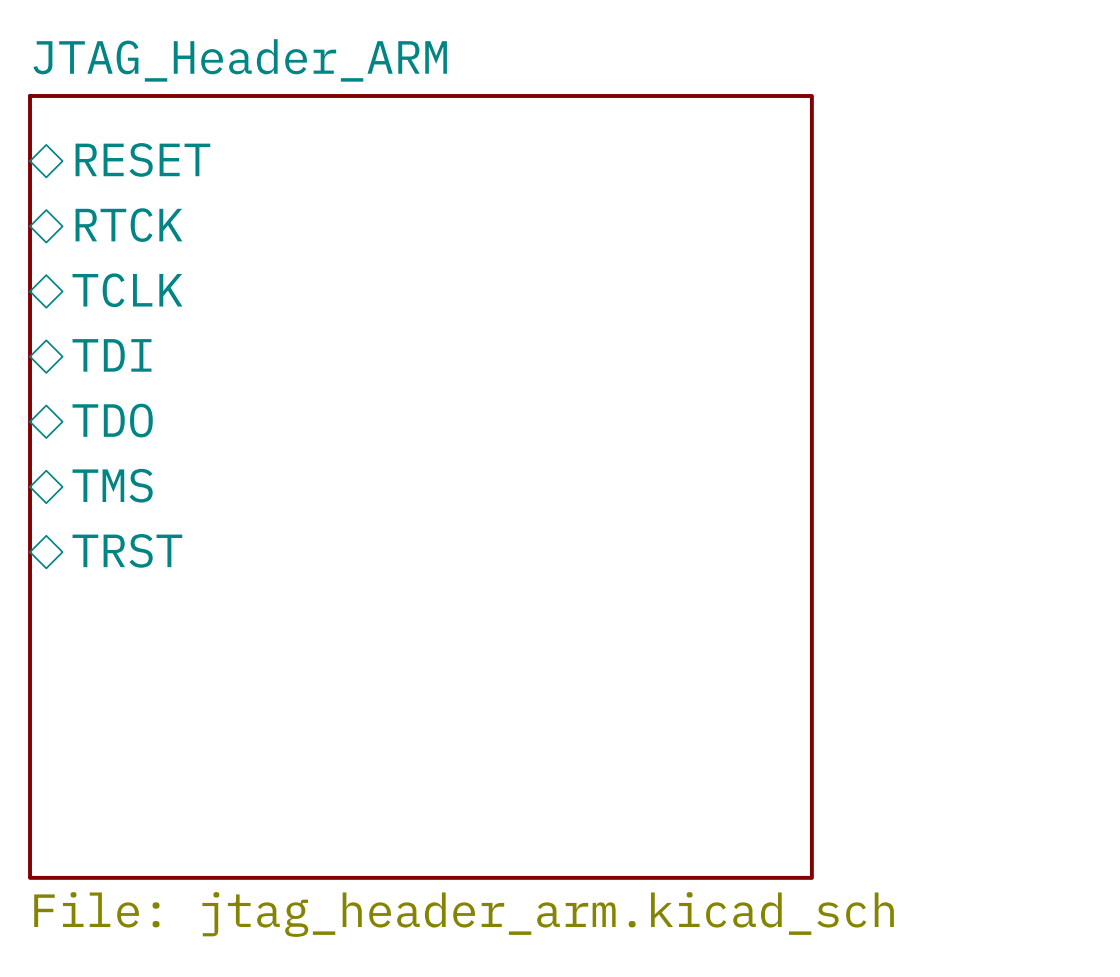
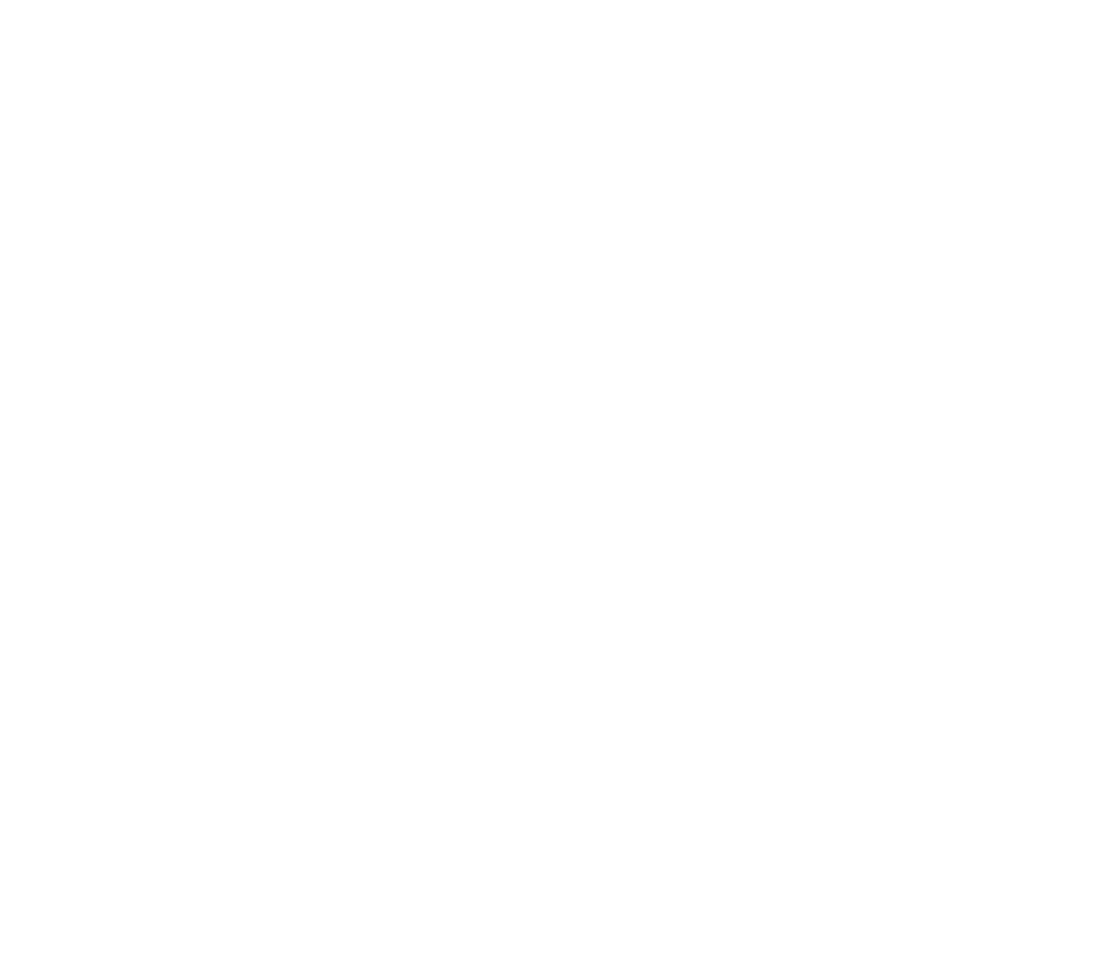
sheet pin: RESET (142, 159) -> none
sheet pin: RTCK (128, 225) -> none
sheet pin: TCLK (127, 290) -> none
sheet pin: TDI (112, 355) -> none
sheet pin: TDO (112, 420) -> none
sheet pin: TMS (112, 485) -> none
sheet JTAG_Header_ARM: File: jtag_header_arm.kicad_sch (420, 486) -> none
sheet pin: TRST (127, 550) -> none

